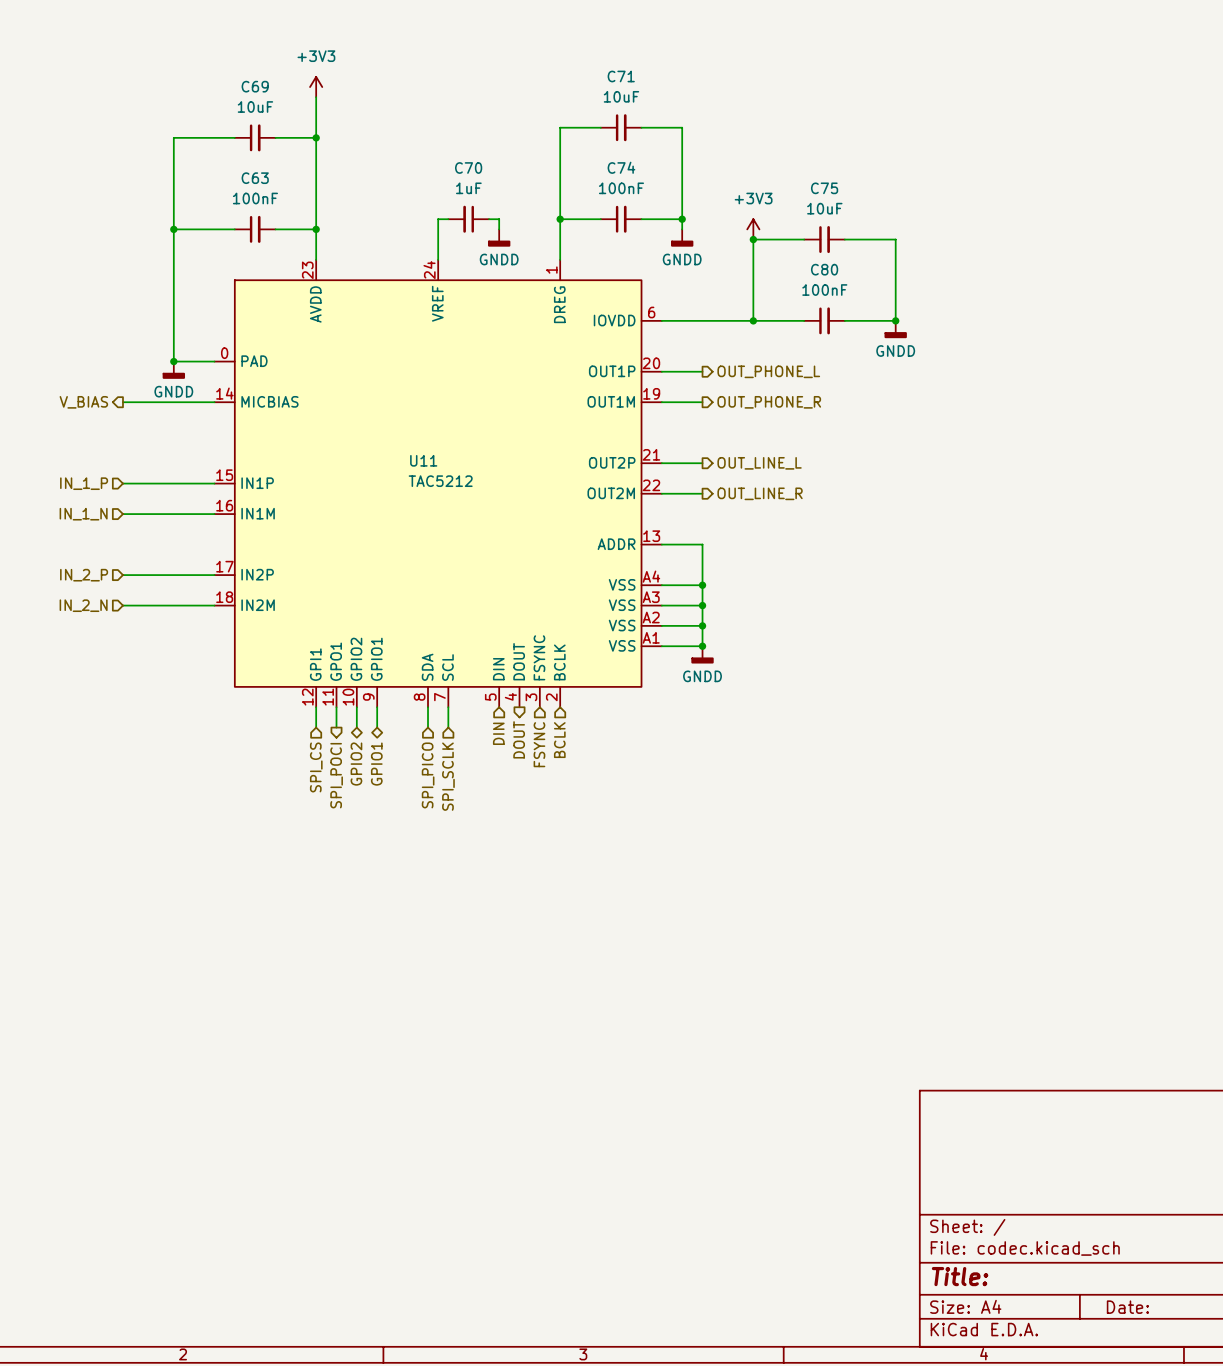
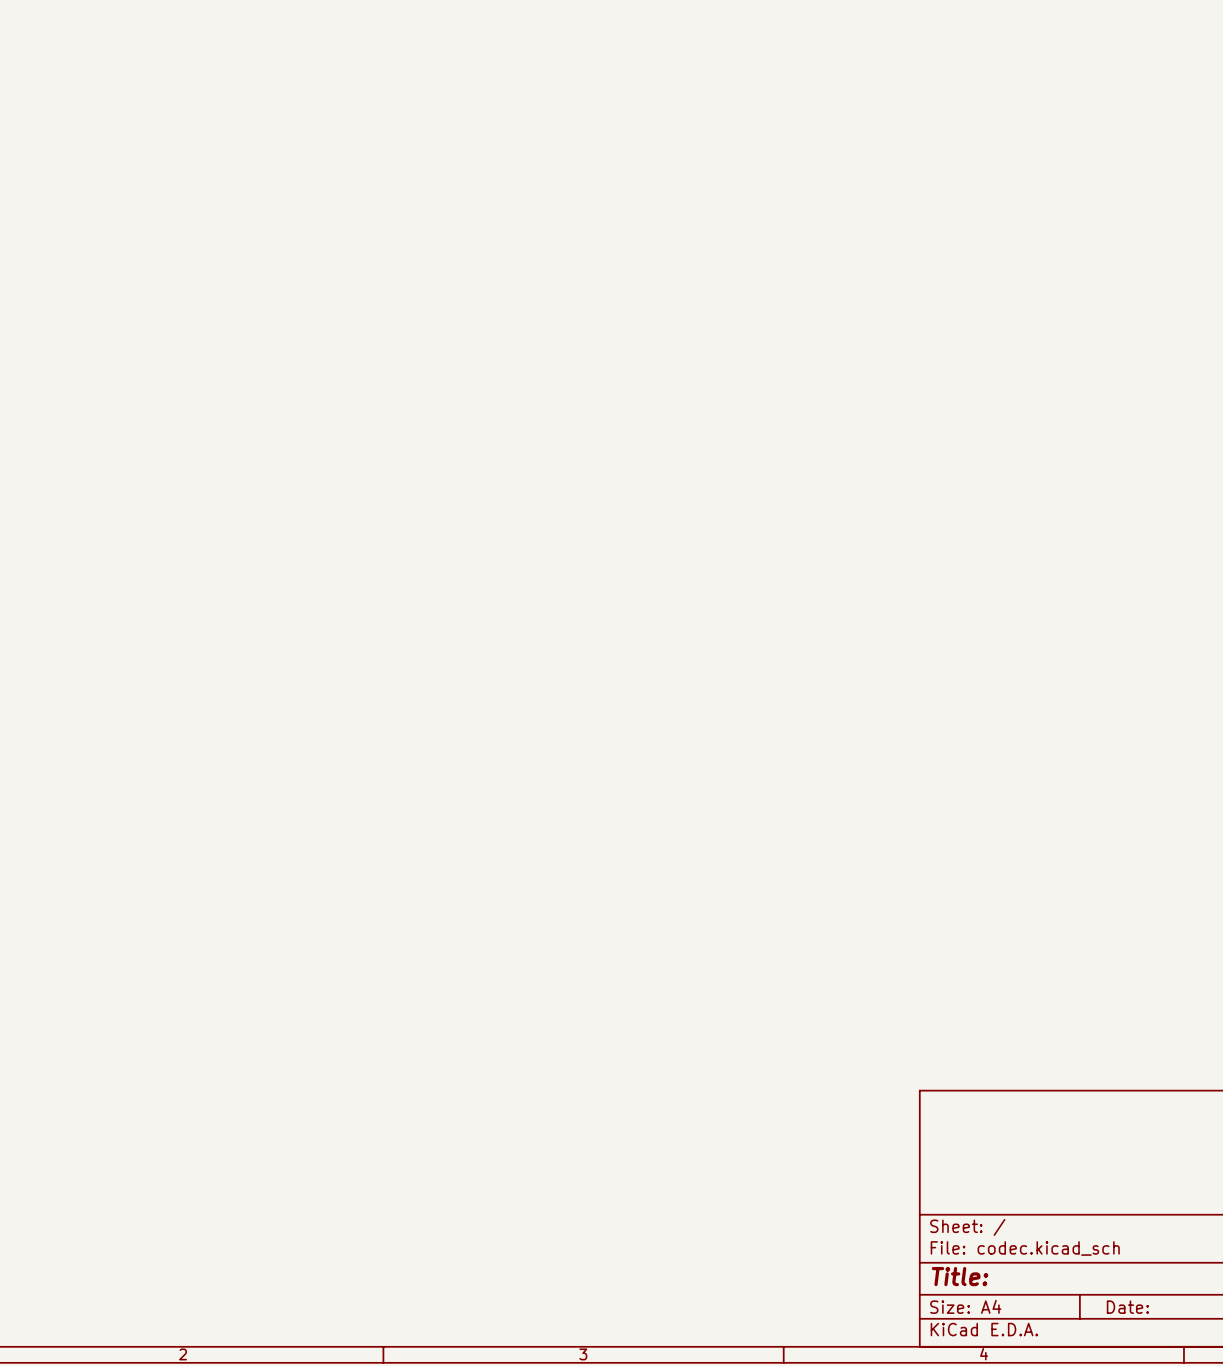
power symbol: +3V3 (316, 87) -> none
wire: (316, 97) (316, 259) -> none
wire: (600, 127) (560, 127) (560, 259) -> none
C71: 10uF (621, 127) -> none
wire: (641, 127) (682, 127) (682, 229) -> none
wire: (234, 137) (173, 137) (173, 361) (214, 361) -> none
C69: 10uF (255, 137) -> none
wire: (275, 137) (316, 137) -> none
junction: (316, 137) -> none
wire: (448, 219) (438, 219) (438, 259) -> none
C70: 1uF (468, 219) -> none
wire: (489, 219) (499, 219) (499, 229) -> none
wire: (560, 219) (600, 219) -> none
junction: (560, 219) -> none
C74: 100nF (621, 219) -> none
wire: (641, 219) (682, 219) -> none
junction: (682, 219) -> none
wire: (173, 229) (234, 229) -> none
junction: (173, 229) -> none
C63: 100nF (255, 229) -> none
wire: (275, 229) (316, 229) -> none
junction: (316, 229) -> none
power symbol: +3V3 (753, 229) -> none
power symbol: GNDD (499, 238) -> none
power symbol: GNDD (682, 238) -> none
junction: (753, 239) -> none
wire: (804, 239) (753, 239) (753, 320) -> none
C75: 10uF (824, 239) -> none
wire: (844, 239) (895, 239) (895, 320) (844, 320) -> none
wire: (661, 320) (804, 320) -> none
junction: (753, 320) -> none
C80: 100nF (824, 320) -> none
junction: (895, 320) -> none
power symbol: GNDD (895, 329) -> none
junction: (173, 361) -> none
power symbol: GNDD (173, 370) -> none
wire: (661, 371) (702, 371) -> none
hierarchical label: OUT_PHONE_L (768, 371) -> none
hierarchical label: V_BIAS (83, 402) -> none
wire: (122, 402) (214, 402) -> none
wire: (661, 402) (702, 402) -> none
hierarchical label: OUT_PHONE_R (769, 402) -> none
wire: (661, 463) (702, 463) -> none
hierarchical label: OUT_LINE_L (759, 463) -> none
hierarchical label: IN_1_P (84, 483) -> none
wire: (122, 483) (214, 483) -> none
U11: TAC5212 (438, 483) -> none
wire: (661, 493) (702, 493) -> none
hierarchical label: OUT_LINE_R (760, 493) -> none
hierarchical label: IN_1_N (83, 514) -> none
wire: (122, 514) (214, 514) -> none
wire: (661, 544) (702, 544) (702, 646) (661, 646) -> none
hierarchical label: IN_2_P (84, 575) -> none
wire: (122, 575) (214, 575) -> none
wire: (661, 585) (702, 585) -> none
junction: (702, 585) -> none
hierarchical label: IN_2_N (83, 605) -> none
wire: (122, 605) (214, 605) -> none
wire: (661, 605) (702, 605) -> none
junction: (702, 605) -> none
wire: (661, 625) (702, 625) -> none
junction: (702, 625) -> none
junction: (702, 646) -> none
power symbol: GNDD (702, 654) -> none
wire: (316, 707) (316, 727) -> none
wire: (336, 707) (336, 727) -> none
wire: (356, 707) (356, 727) -> none
wire: (377, 707) (377, 727) -> none
wire: (428, 707) (428, 727) -> none
wire: (448, 707) (448, 727) -> none
hierarchical label: DIN (498, 733) -> none
hierarchical label: DOUT (519, 739) -> none
hierarchical label: BCLK (559, 740) -> none
hierarchical label: FSYNC (539, 744) -> none
hierarchical label: GPIO2 (356, 764) -> none
hierarchical label: GPIO1 (376, 764) -> none
hierarchical label: SPI_CS (316, 767) -> none
hierarchical label: SPI_POCI (336, 775) -> none
hierarchical label: SPI_PICO (428, 775) -> none
hierarchical label: SPI_SCLK (448, 776) -> none

